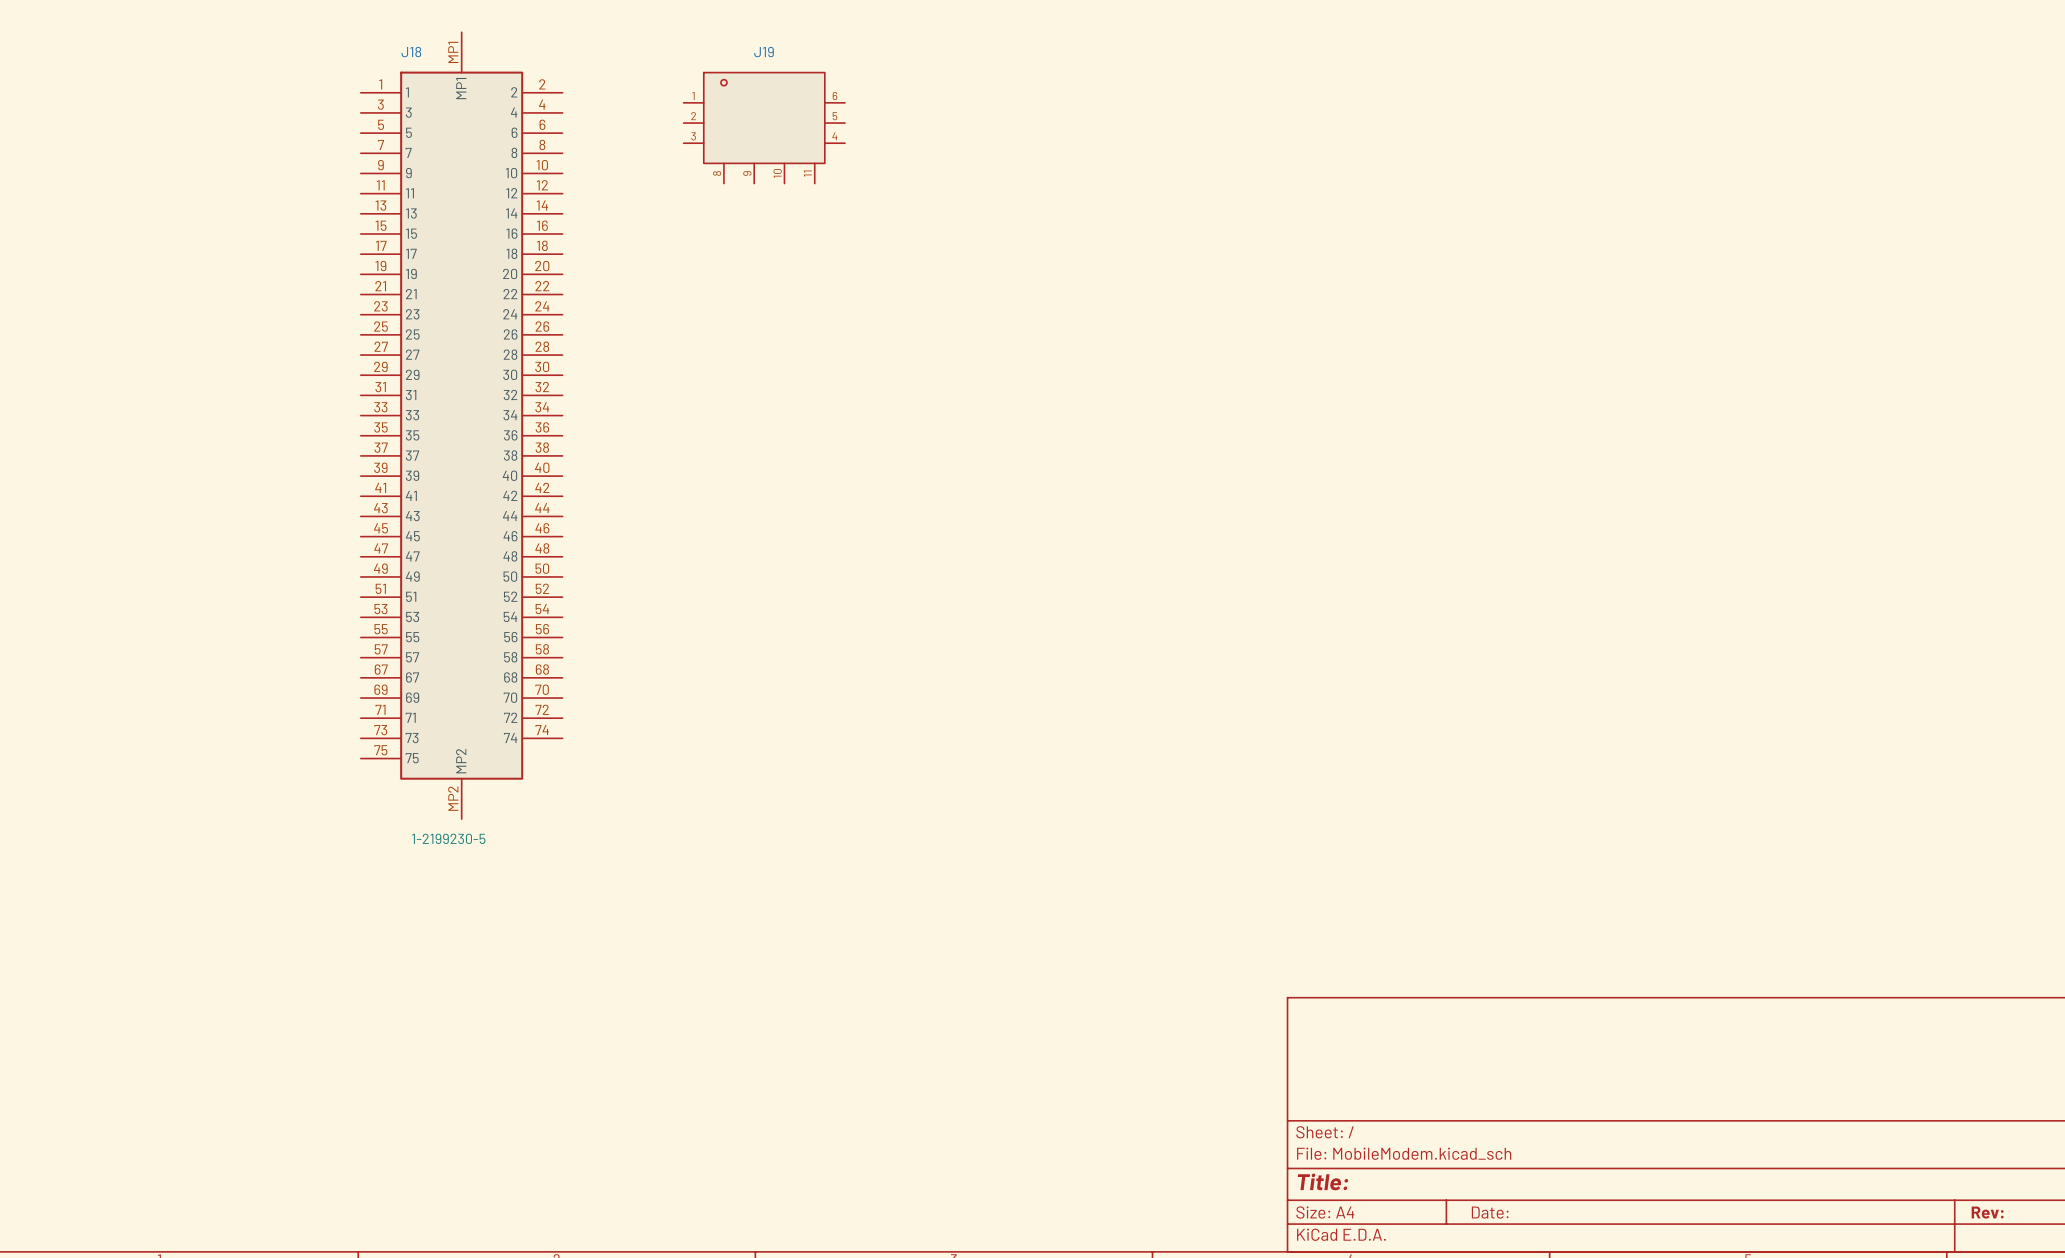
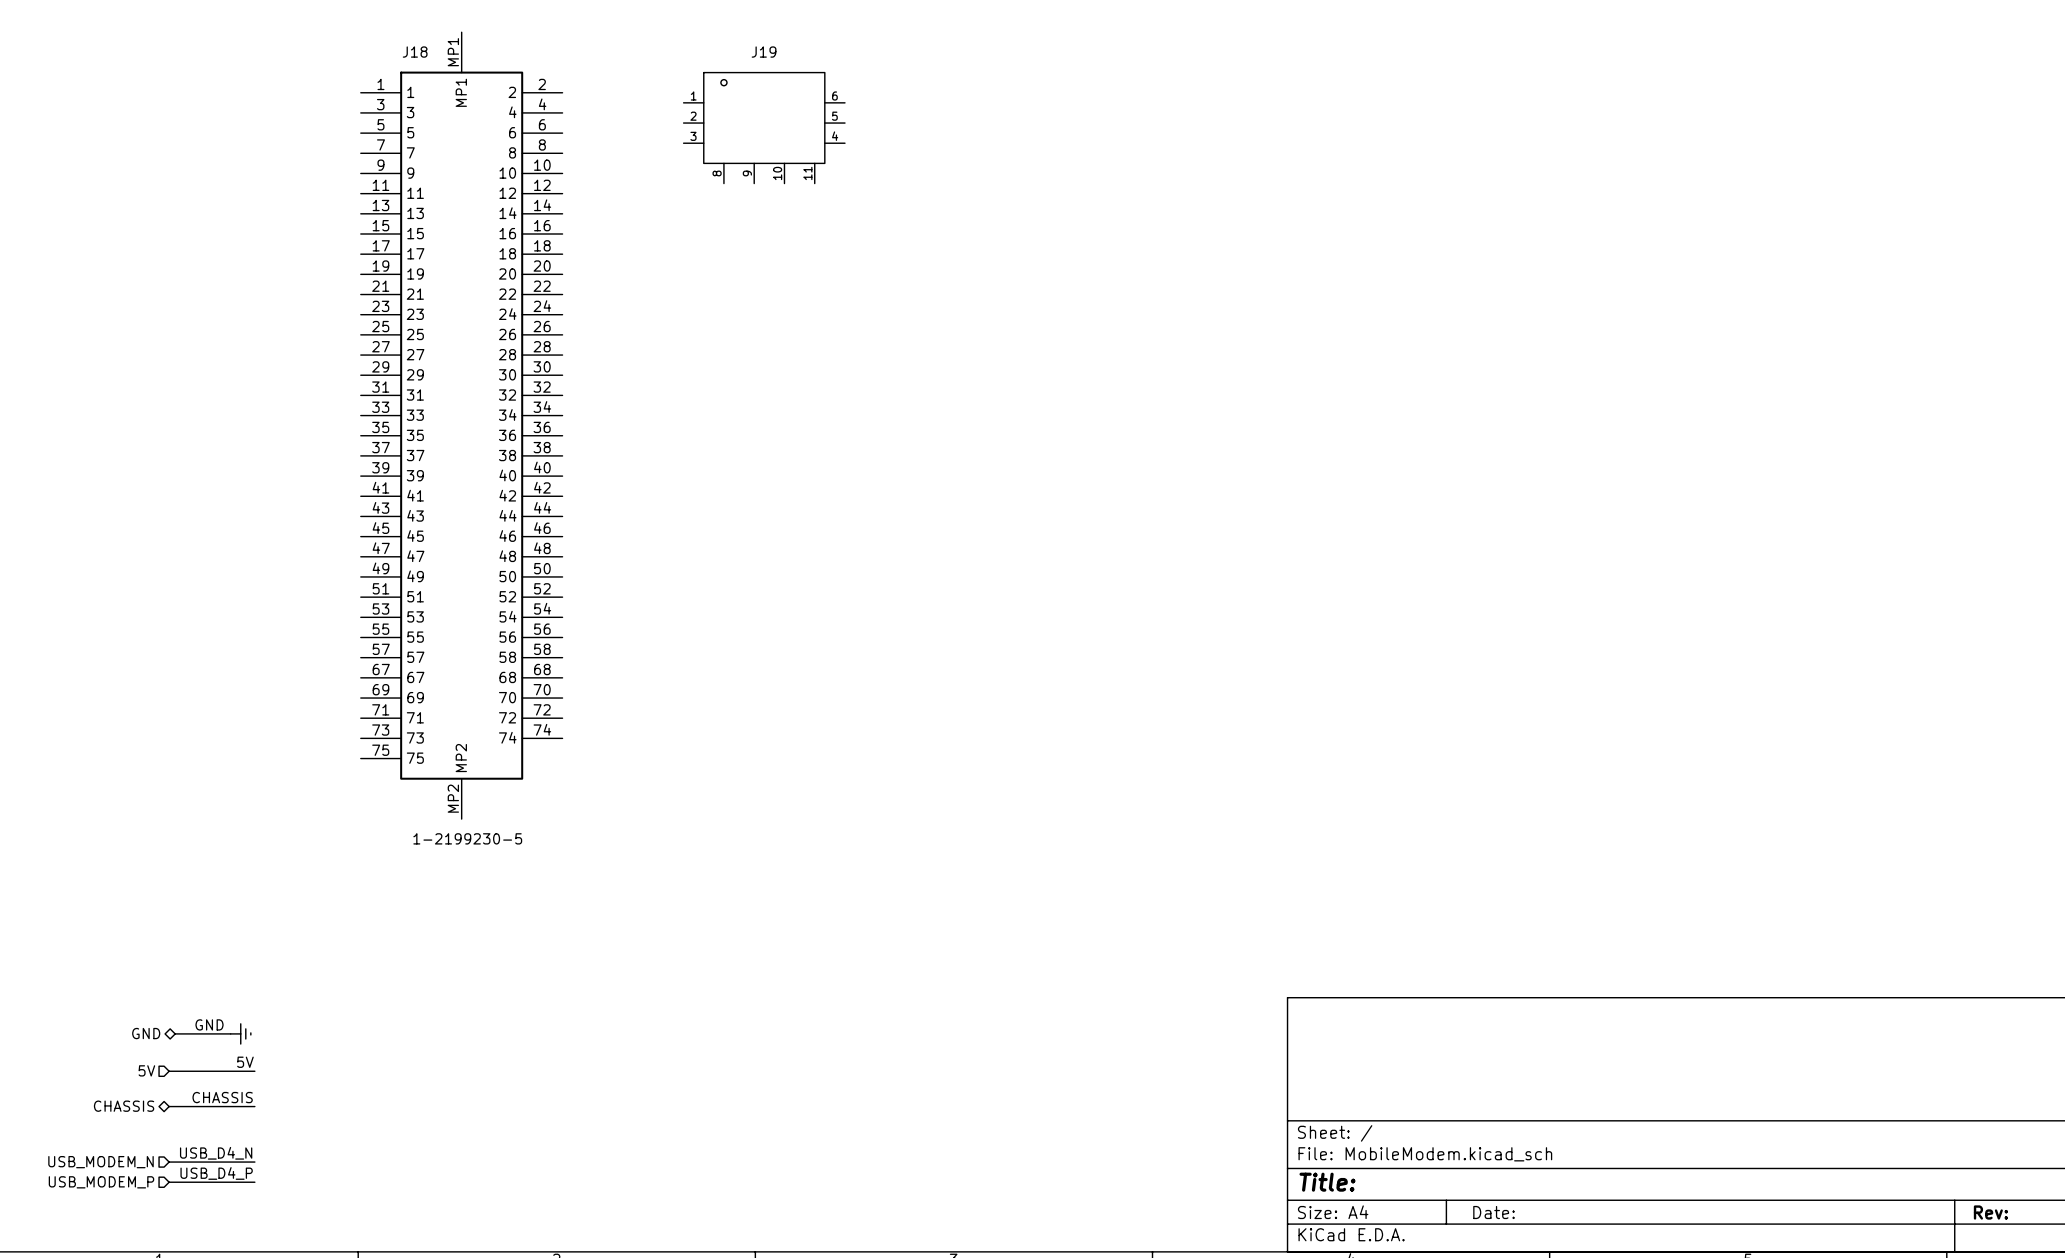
label: none -> GND (209, 1024)
hierarchical label: none -> GND (146, 1033)
wire: none -> (175, 1033) (230, 1033)
power symbol: none -> (240, 1033)
label: none -> 5V (245, 1062)
hierarchical label: none -> 5V (146, 1070)
wire: none -> (169, 1071) (254, 1071)
label: none -> CHASSIS (222, 1097)
hierarchical label: none -> CHASSIS (124, 1106)
wire: none -> (169, 1106) (254, 1106)
label: none -> USB_D4_N (216, 1153)
hierarchical label: none -> USB_MODEM_N (101, 1162)
wire: none -> (169, 1162) (254, 1162)
label: none -> USB_D4_P (216, 1173)
hierarchical label: none -> USB_MODEM_P (101, 1182)
wire: none -> (169, 1182) (254, 1182)

